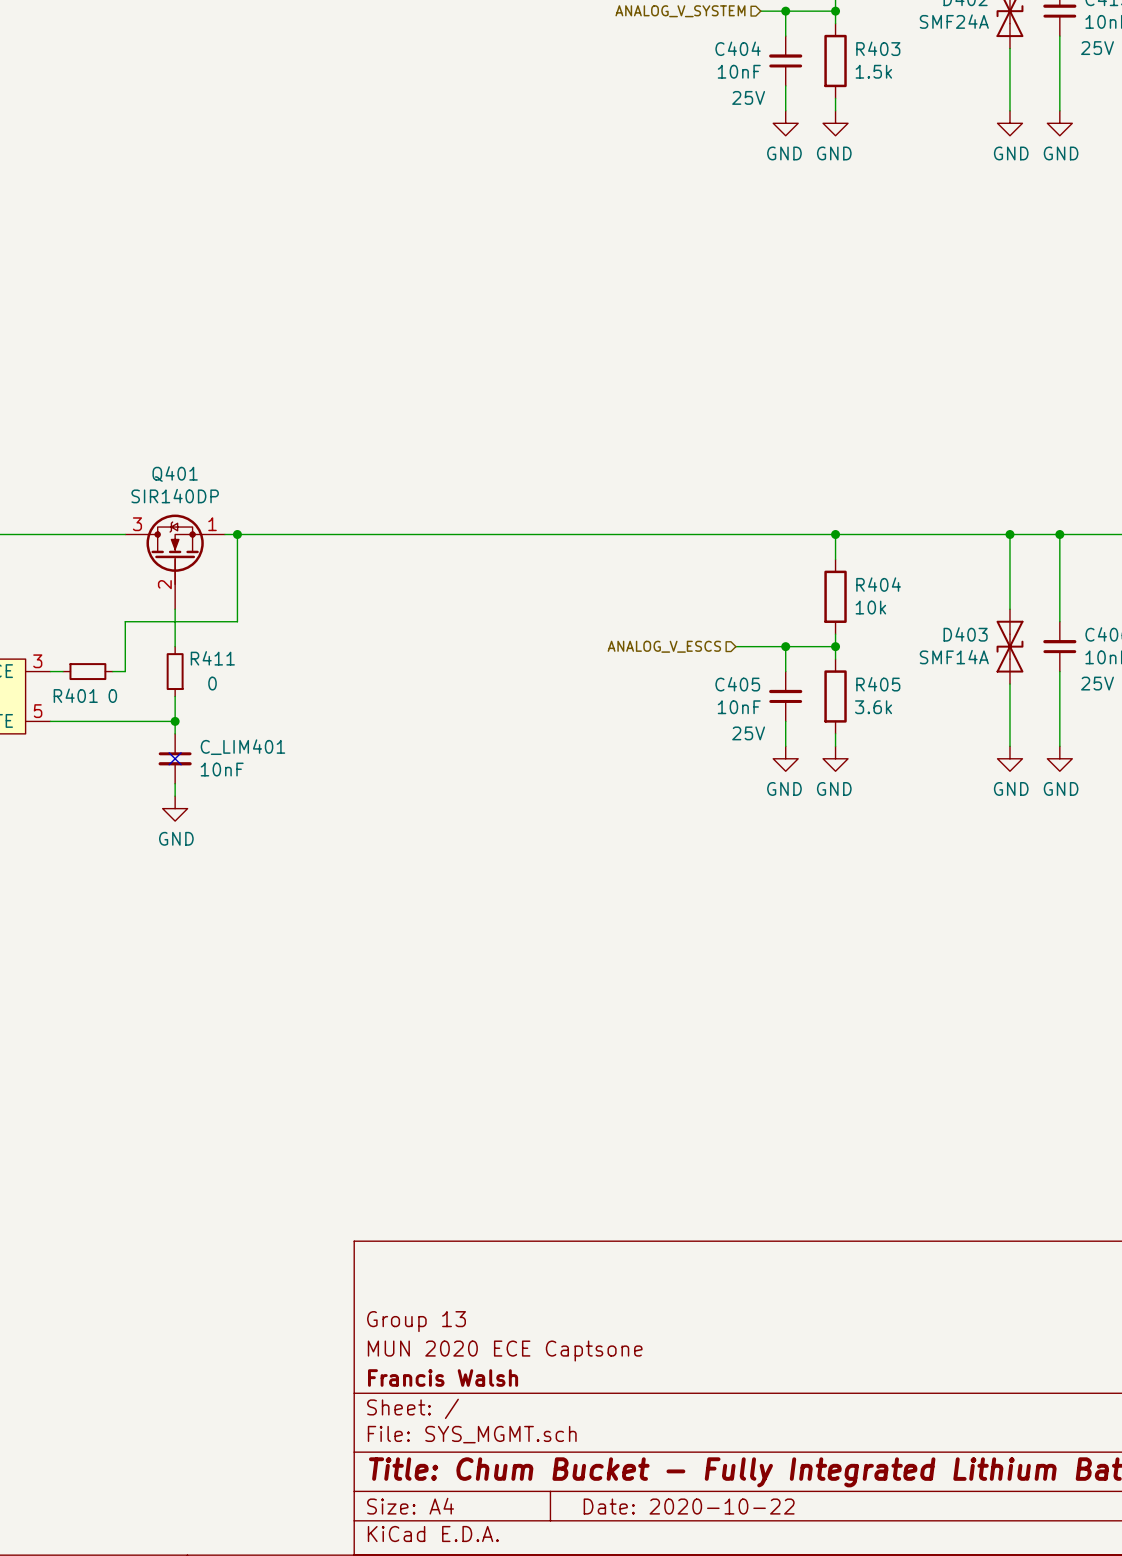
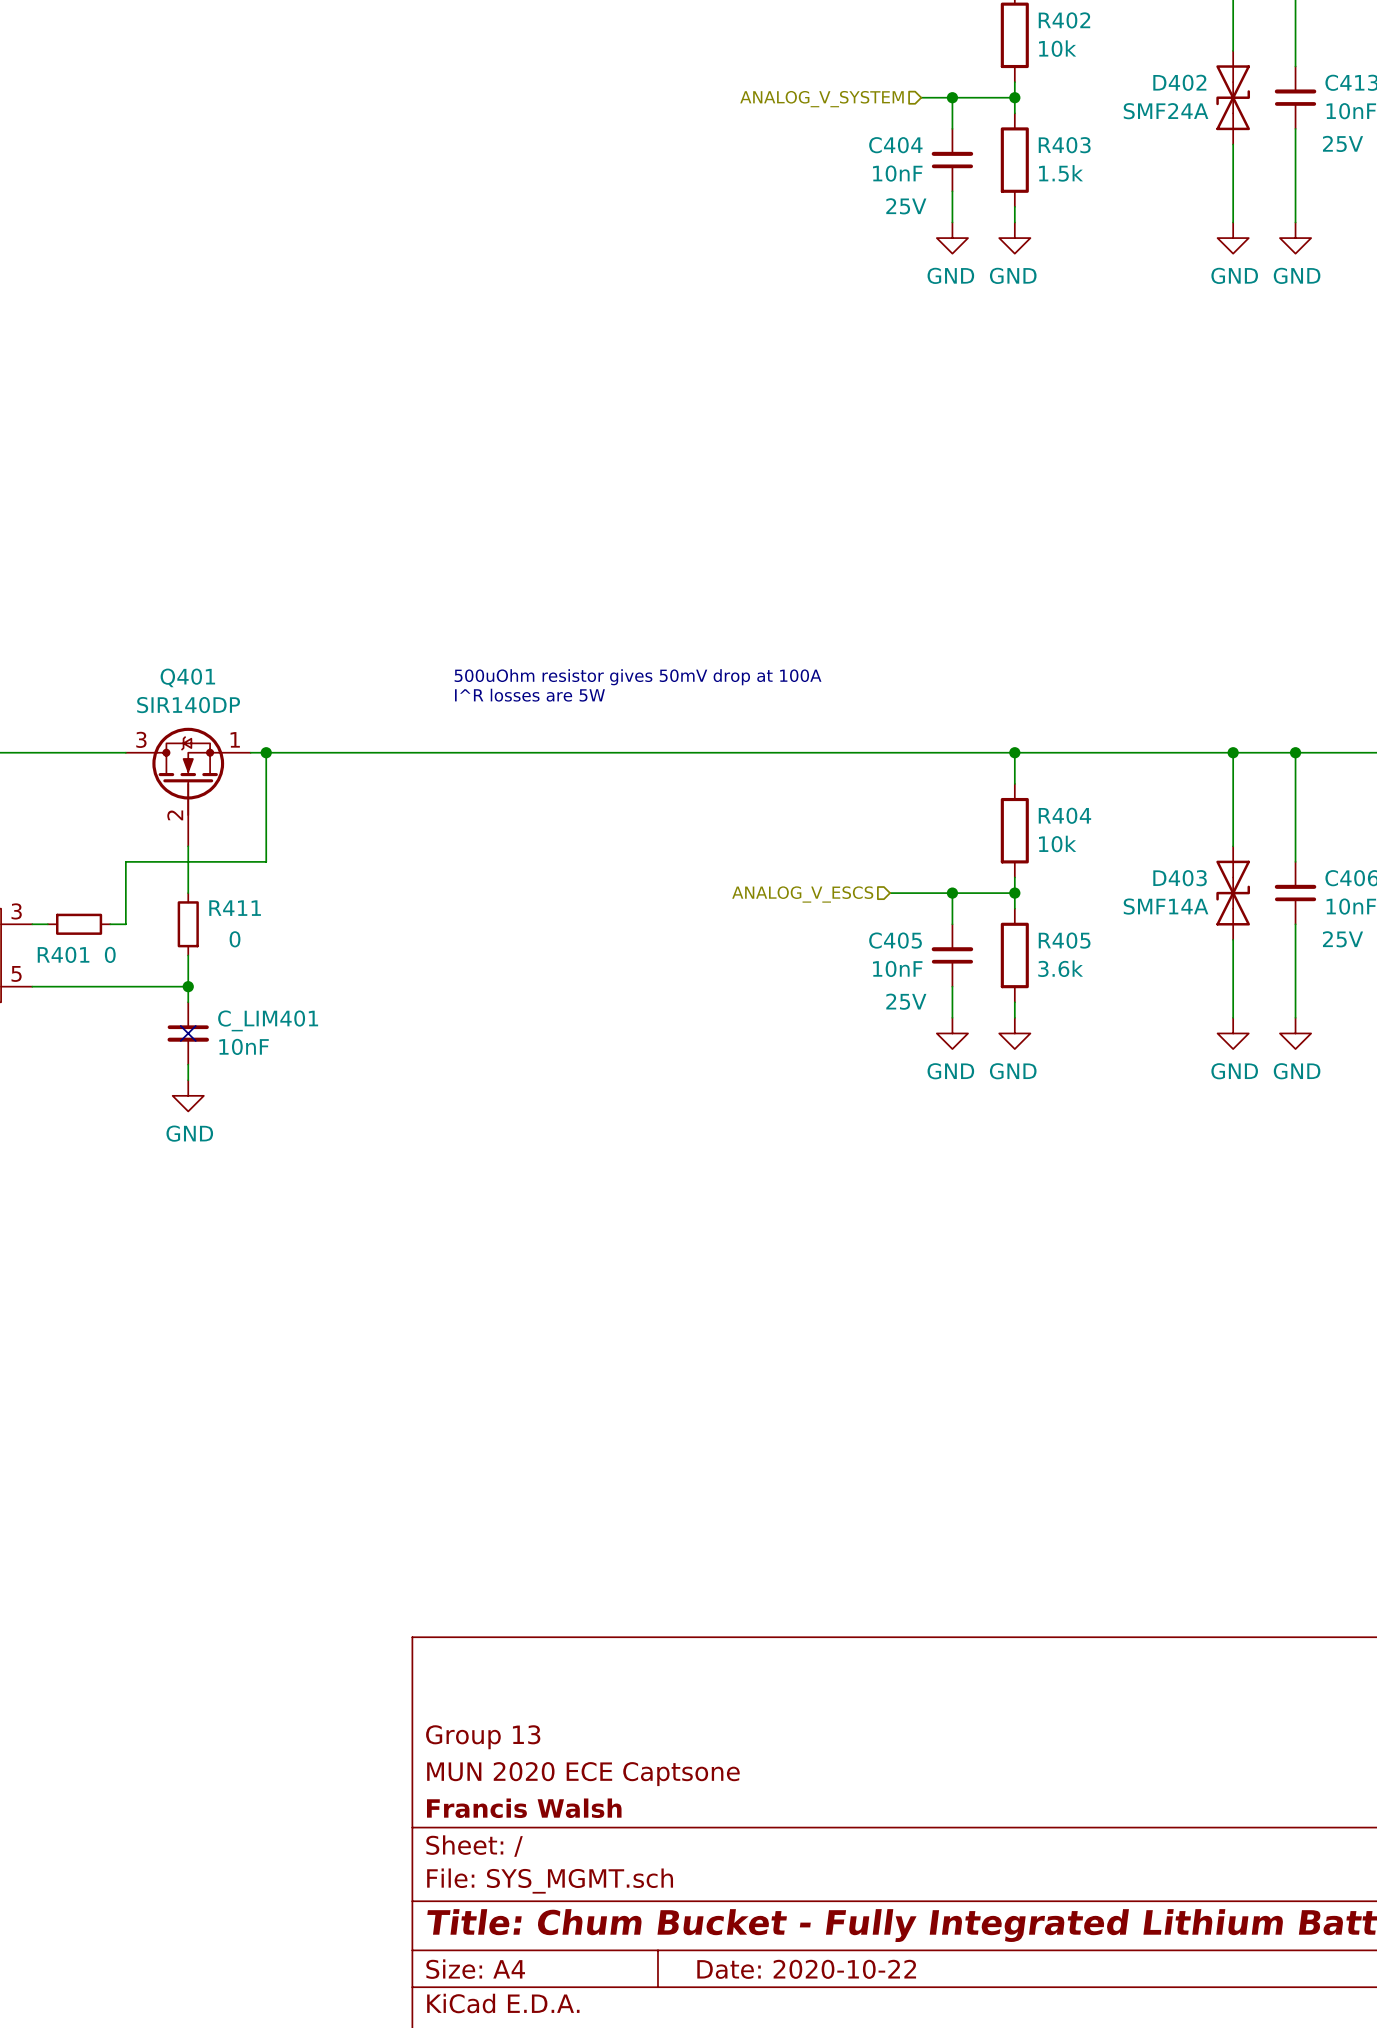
text: none -> 500uOhm resistor gives 50mV drop at 100A (638, 677)
text: none -> I^R losses are 5W (529, 695)

